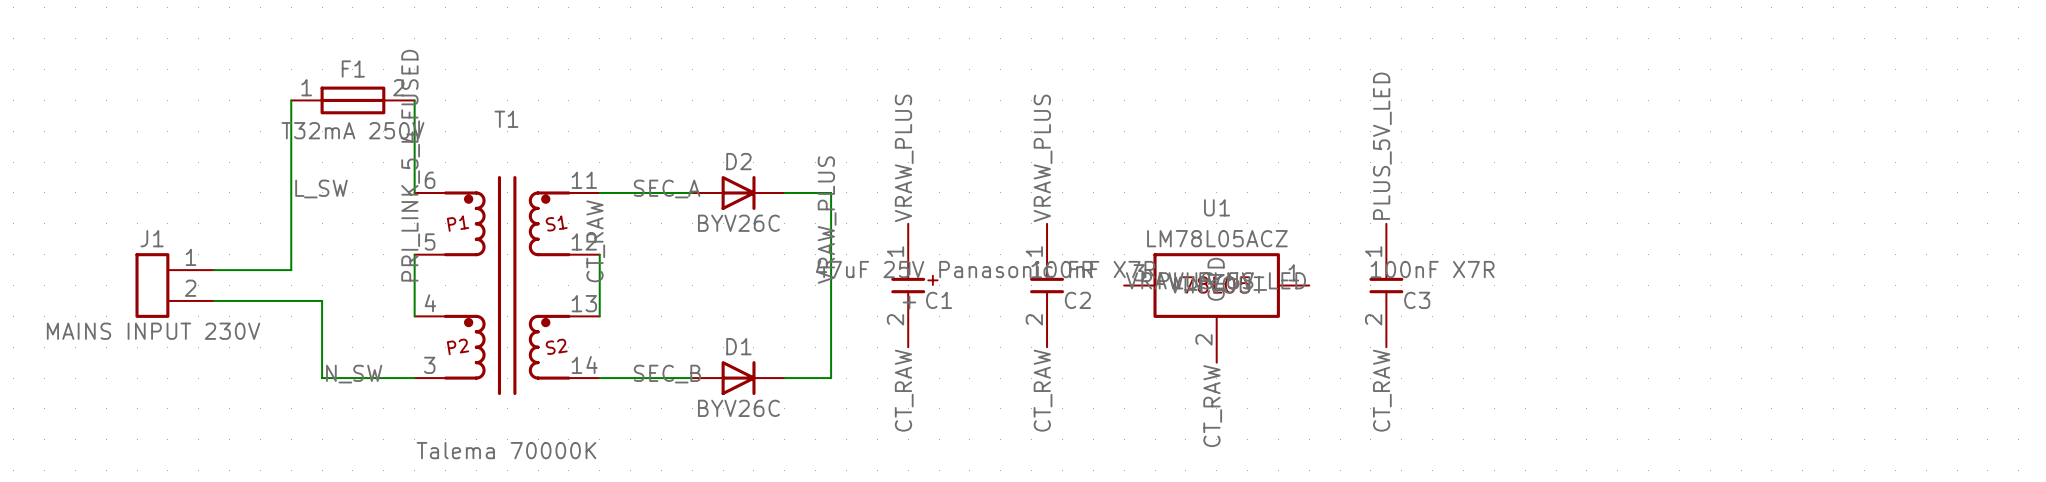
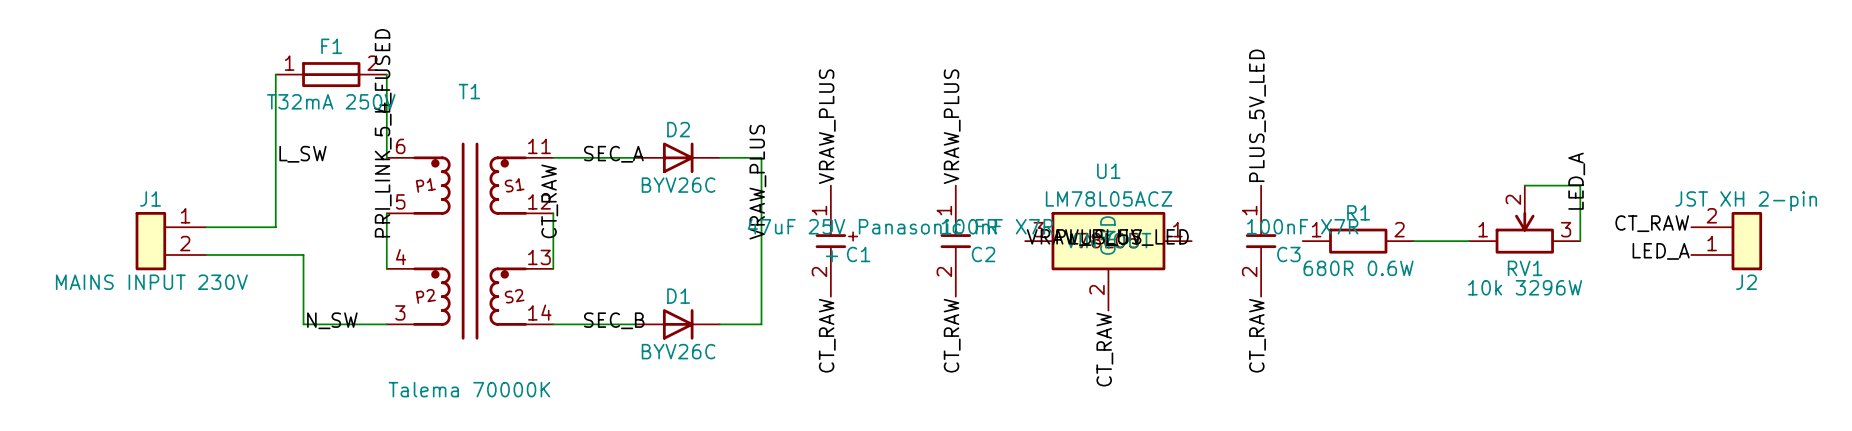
label: none -> LED_A (1576, 181)
wire: none -> (1524, 185) (1580, 185) (1580, 241)
RV1: none -> 10k 3296W (1524, 219)
label: none -> CT_RAW (1652, 223)
R1: none -> 680R 0.6W (1358, 241)
wire: none -> (1413, 241) (1469, 241)
J2: none -> JST XH 2-pin (1726, 241)
label: none -> LED_A (1661, 251)

